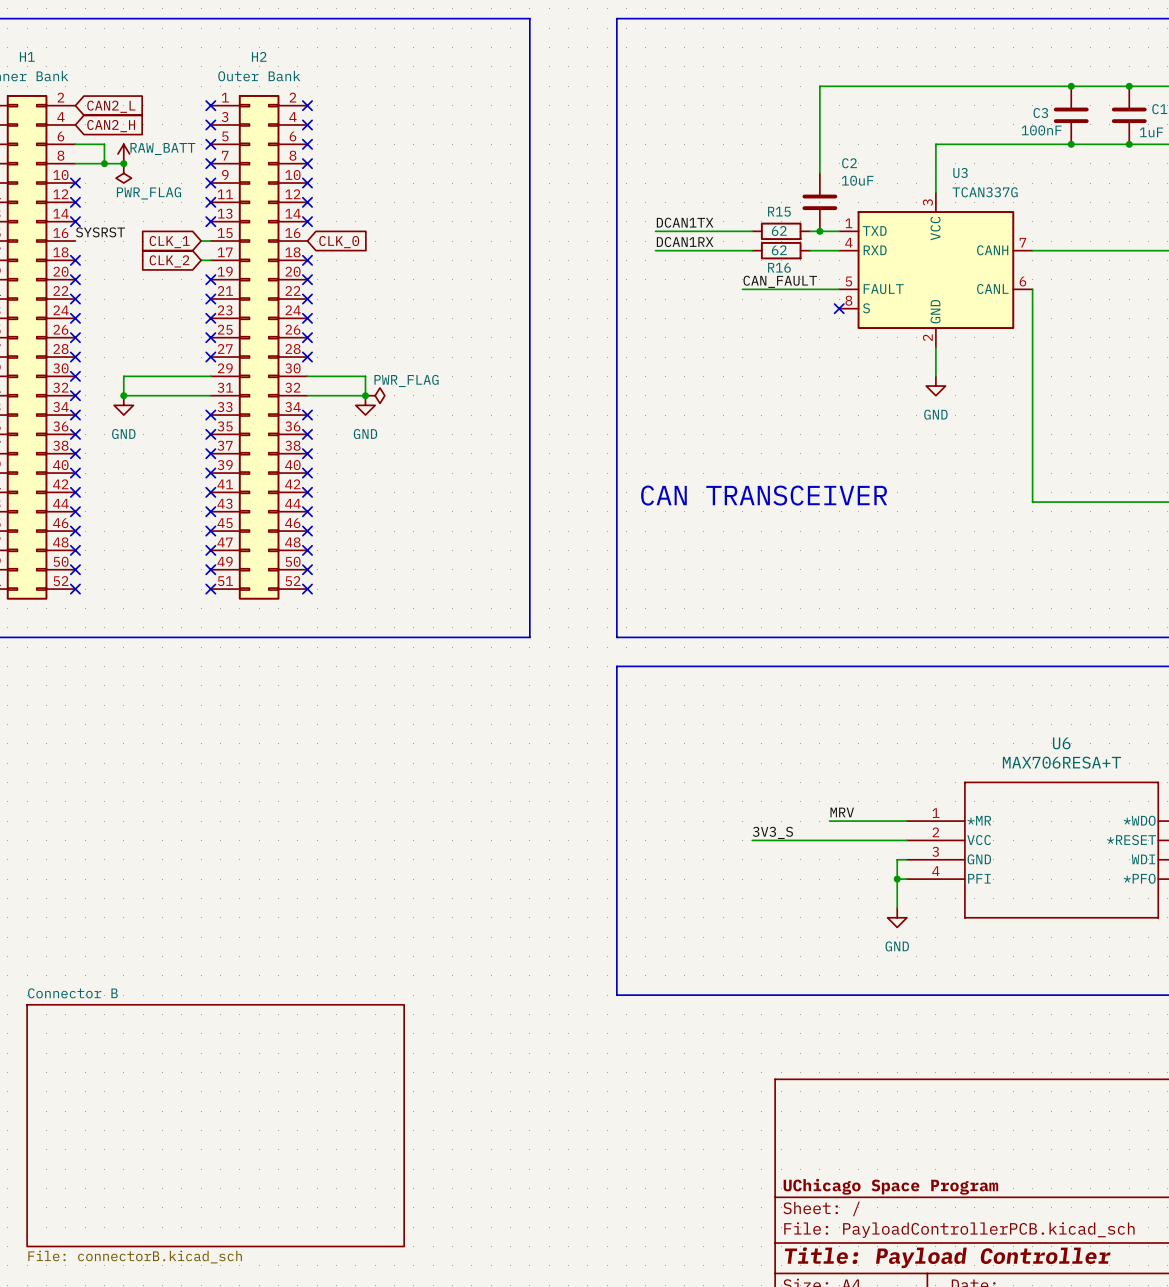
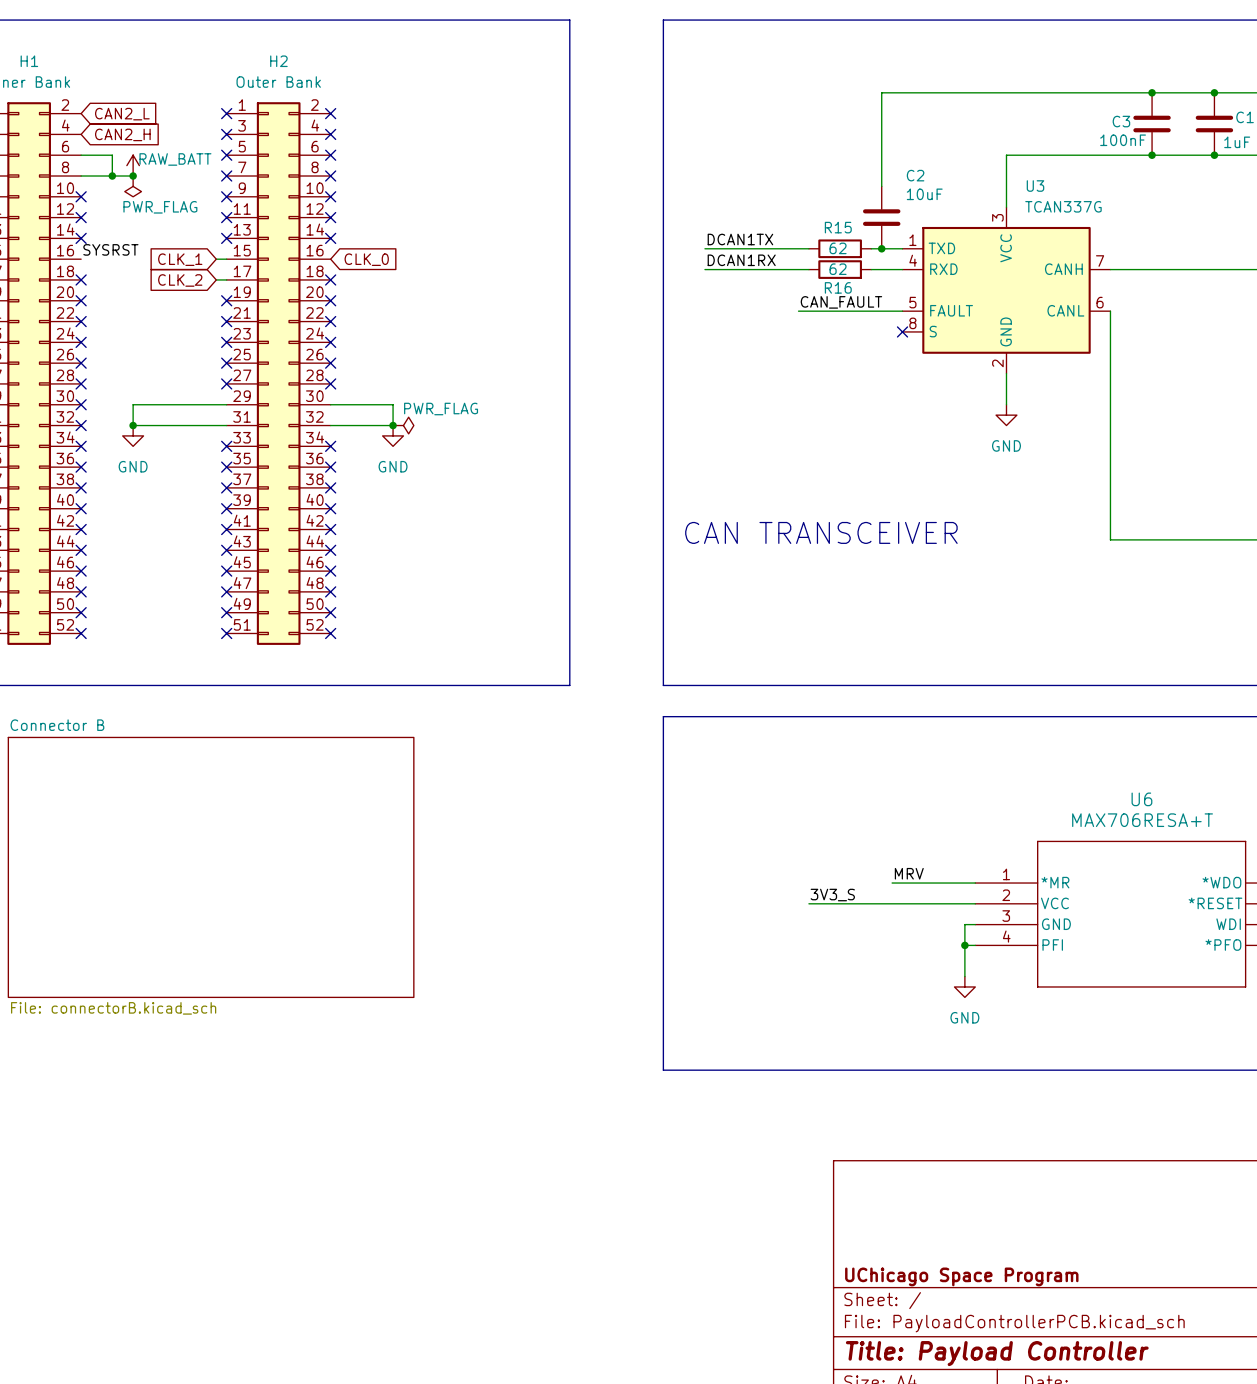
sheet Connector B: none -> File: connectorB.kicad_sch (211, 867)
sheet Connector B: File: connectorB.kicad_sch (215, 1125) -> none

